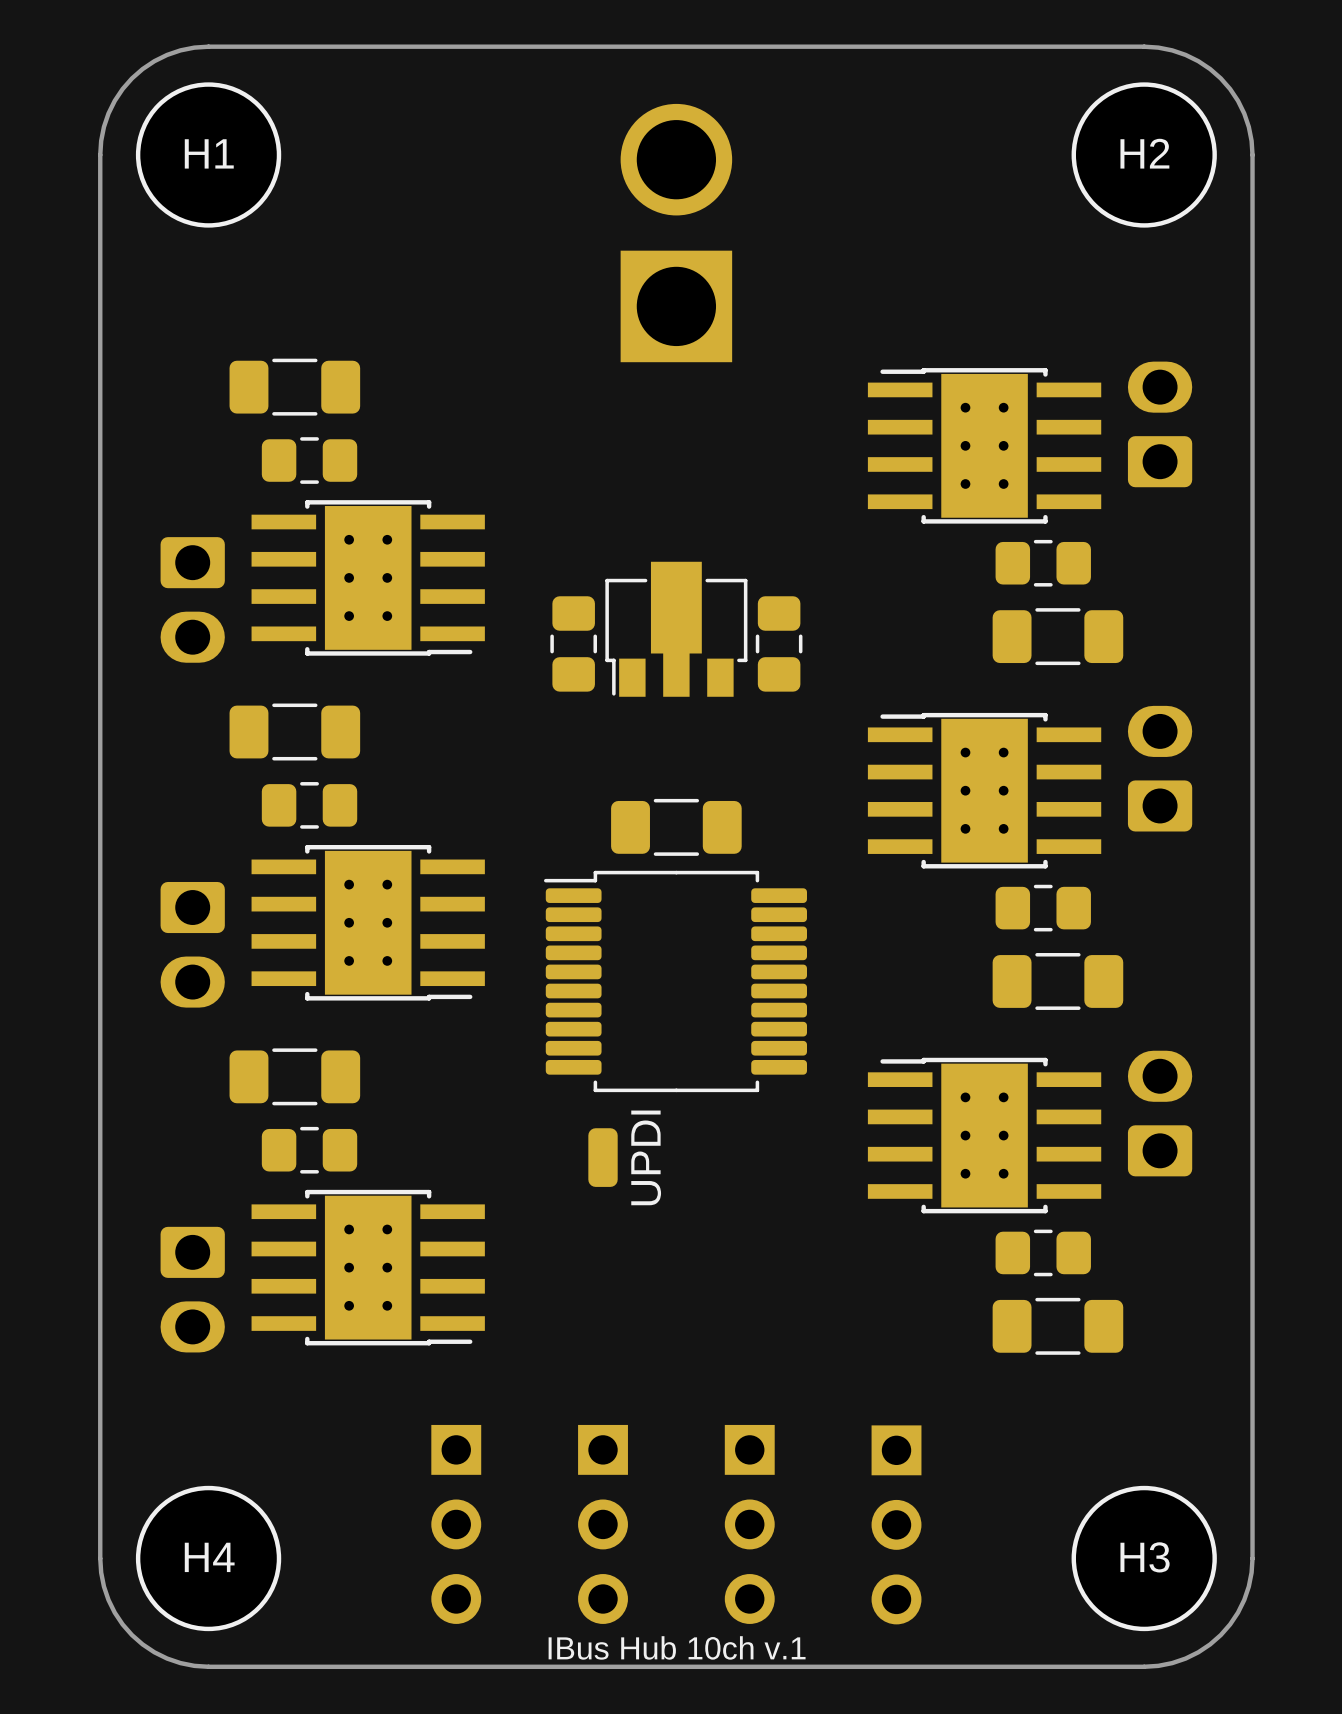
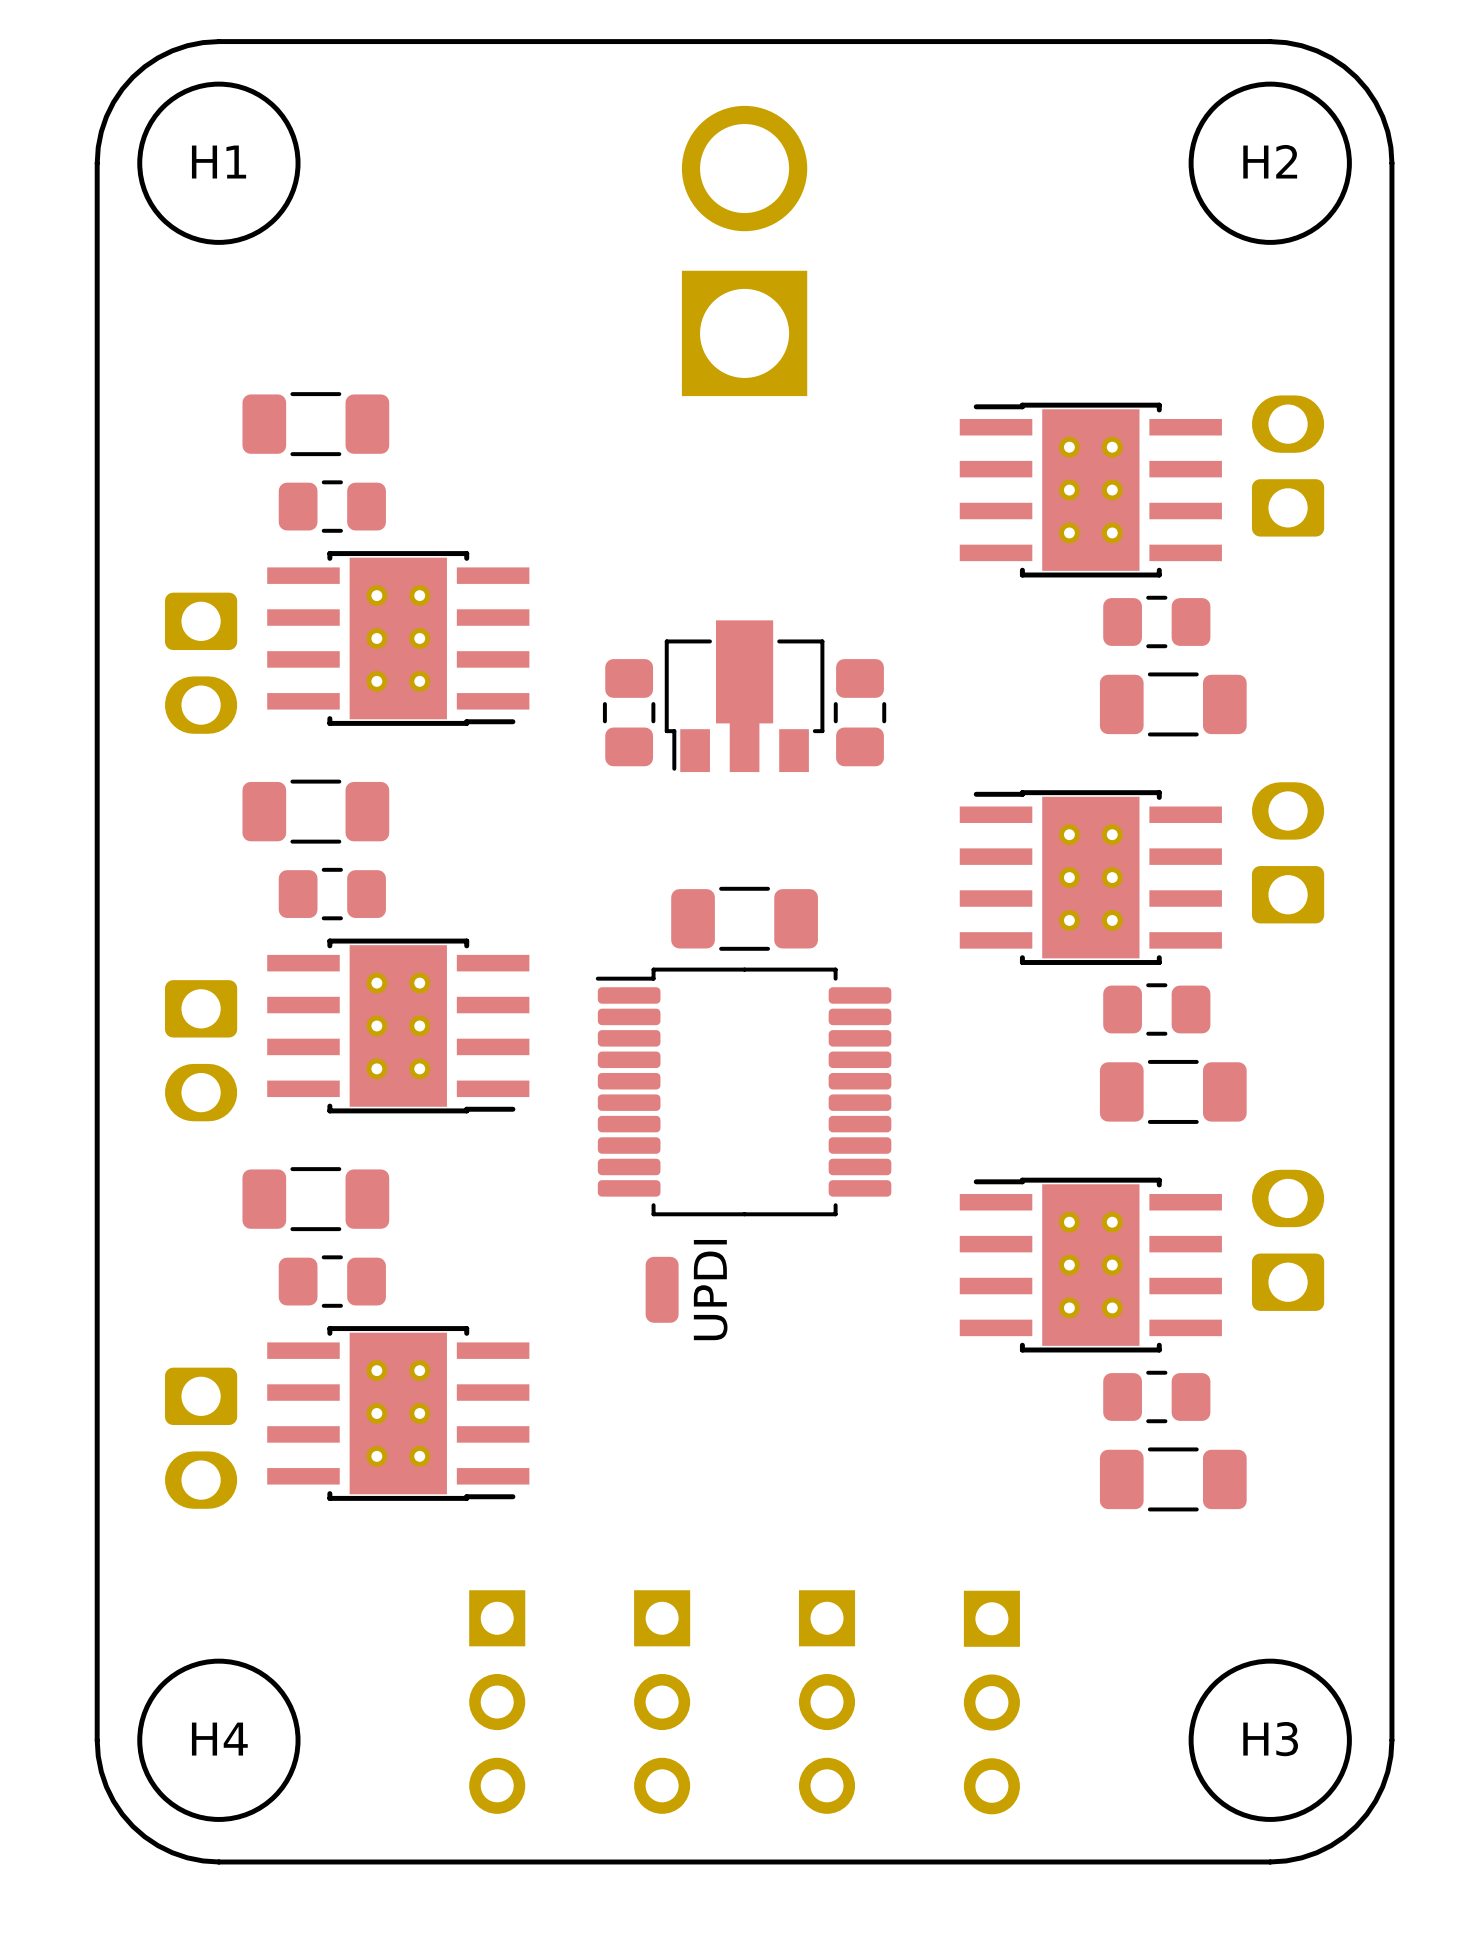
text: IBus Hub 10ch v.1 (677, 1647) -> none

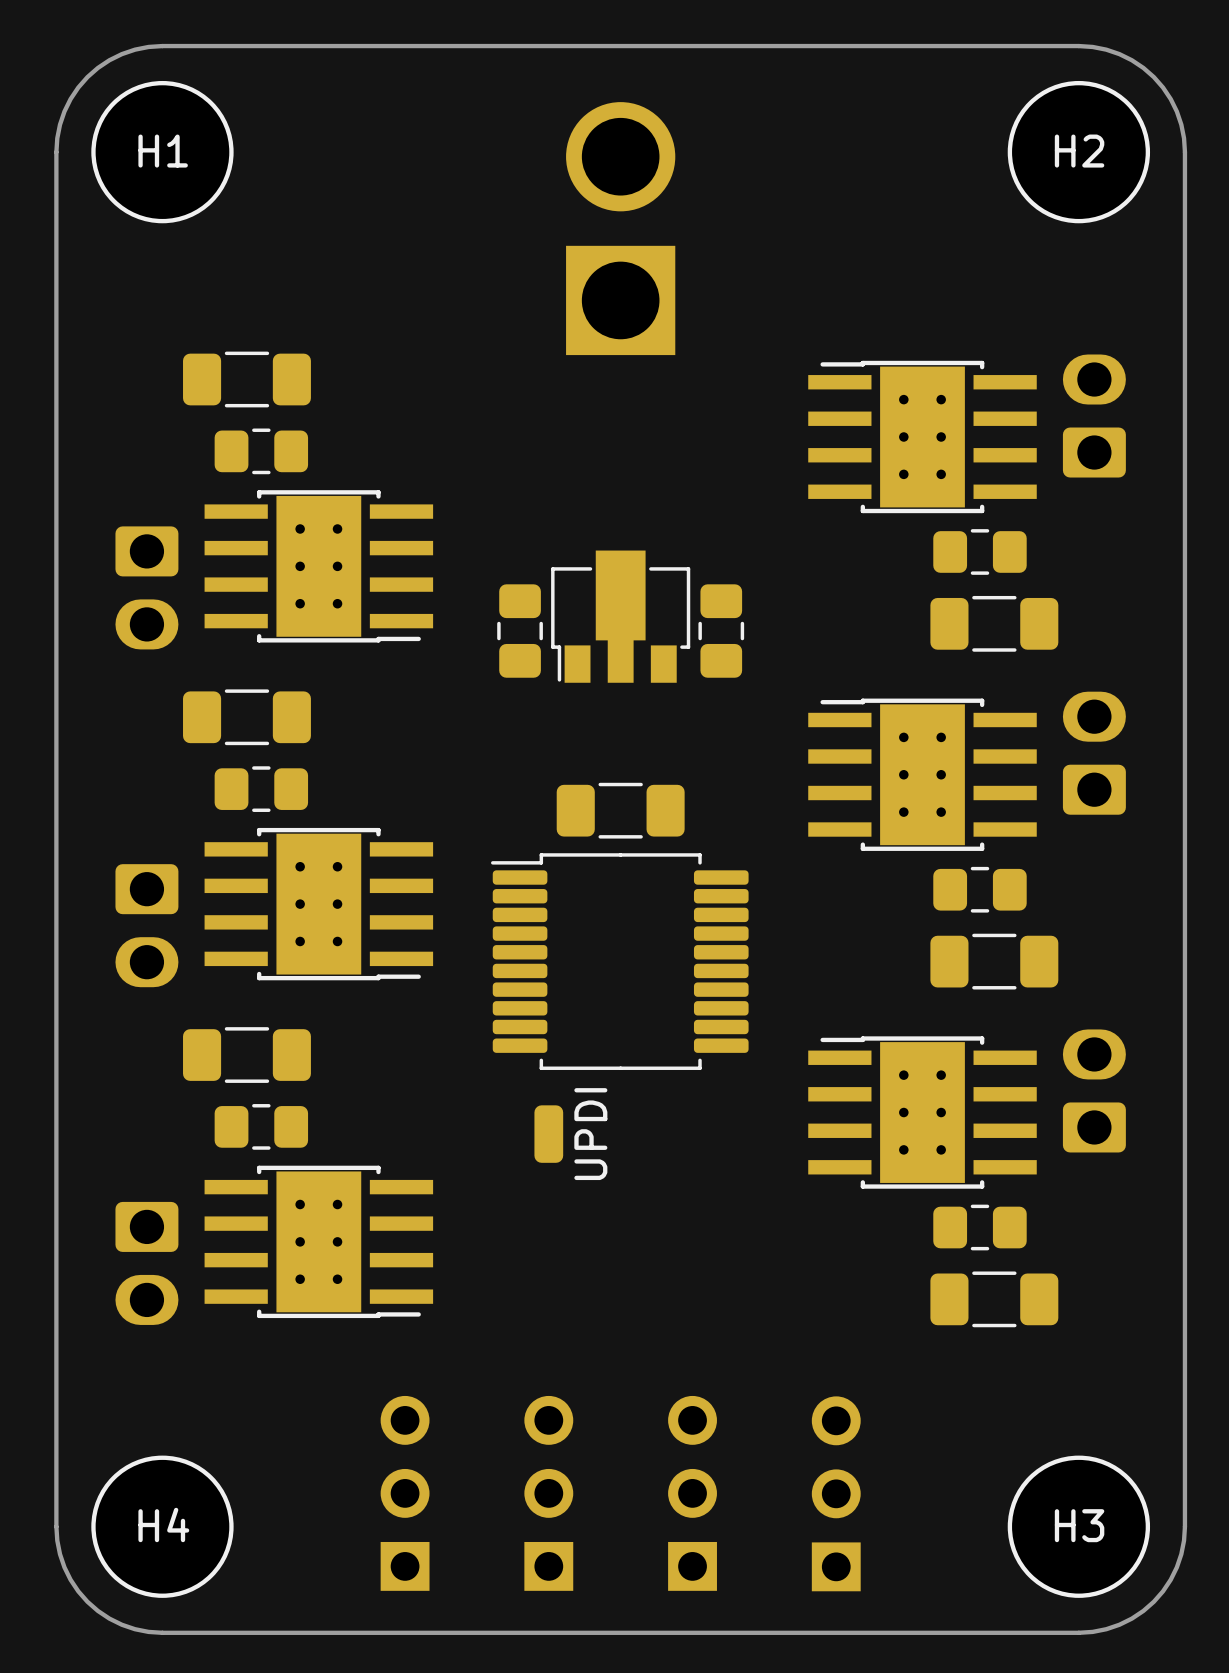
part rotation: 0° (497, 1702) -> 180° (405, 1493)
part rotation: 0° (662, 1702) -> 180° (548, 1493)
part rotation: 0° (827, 1702) -> 180° (692, 1493)
part rotation: 0° (991, 1702) -> 180° (836, 1493)

